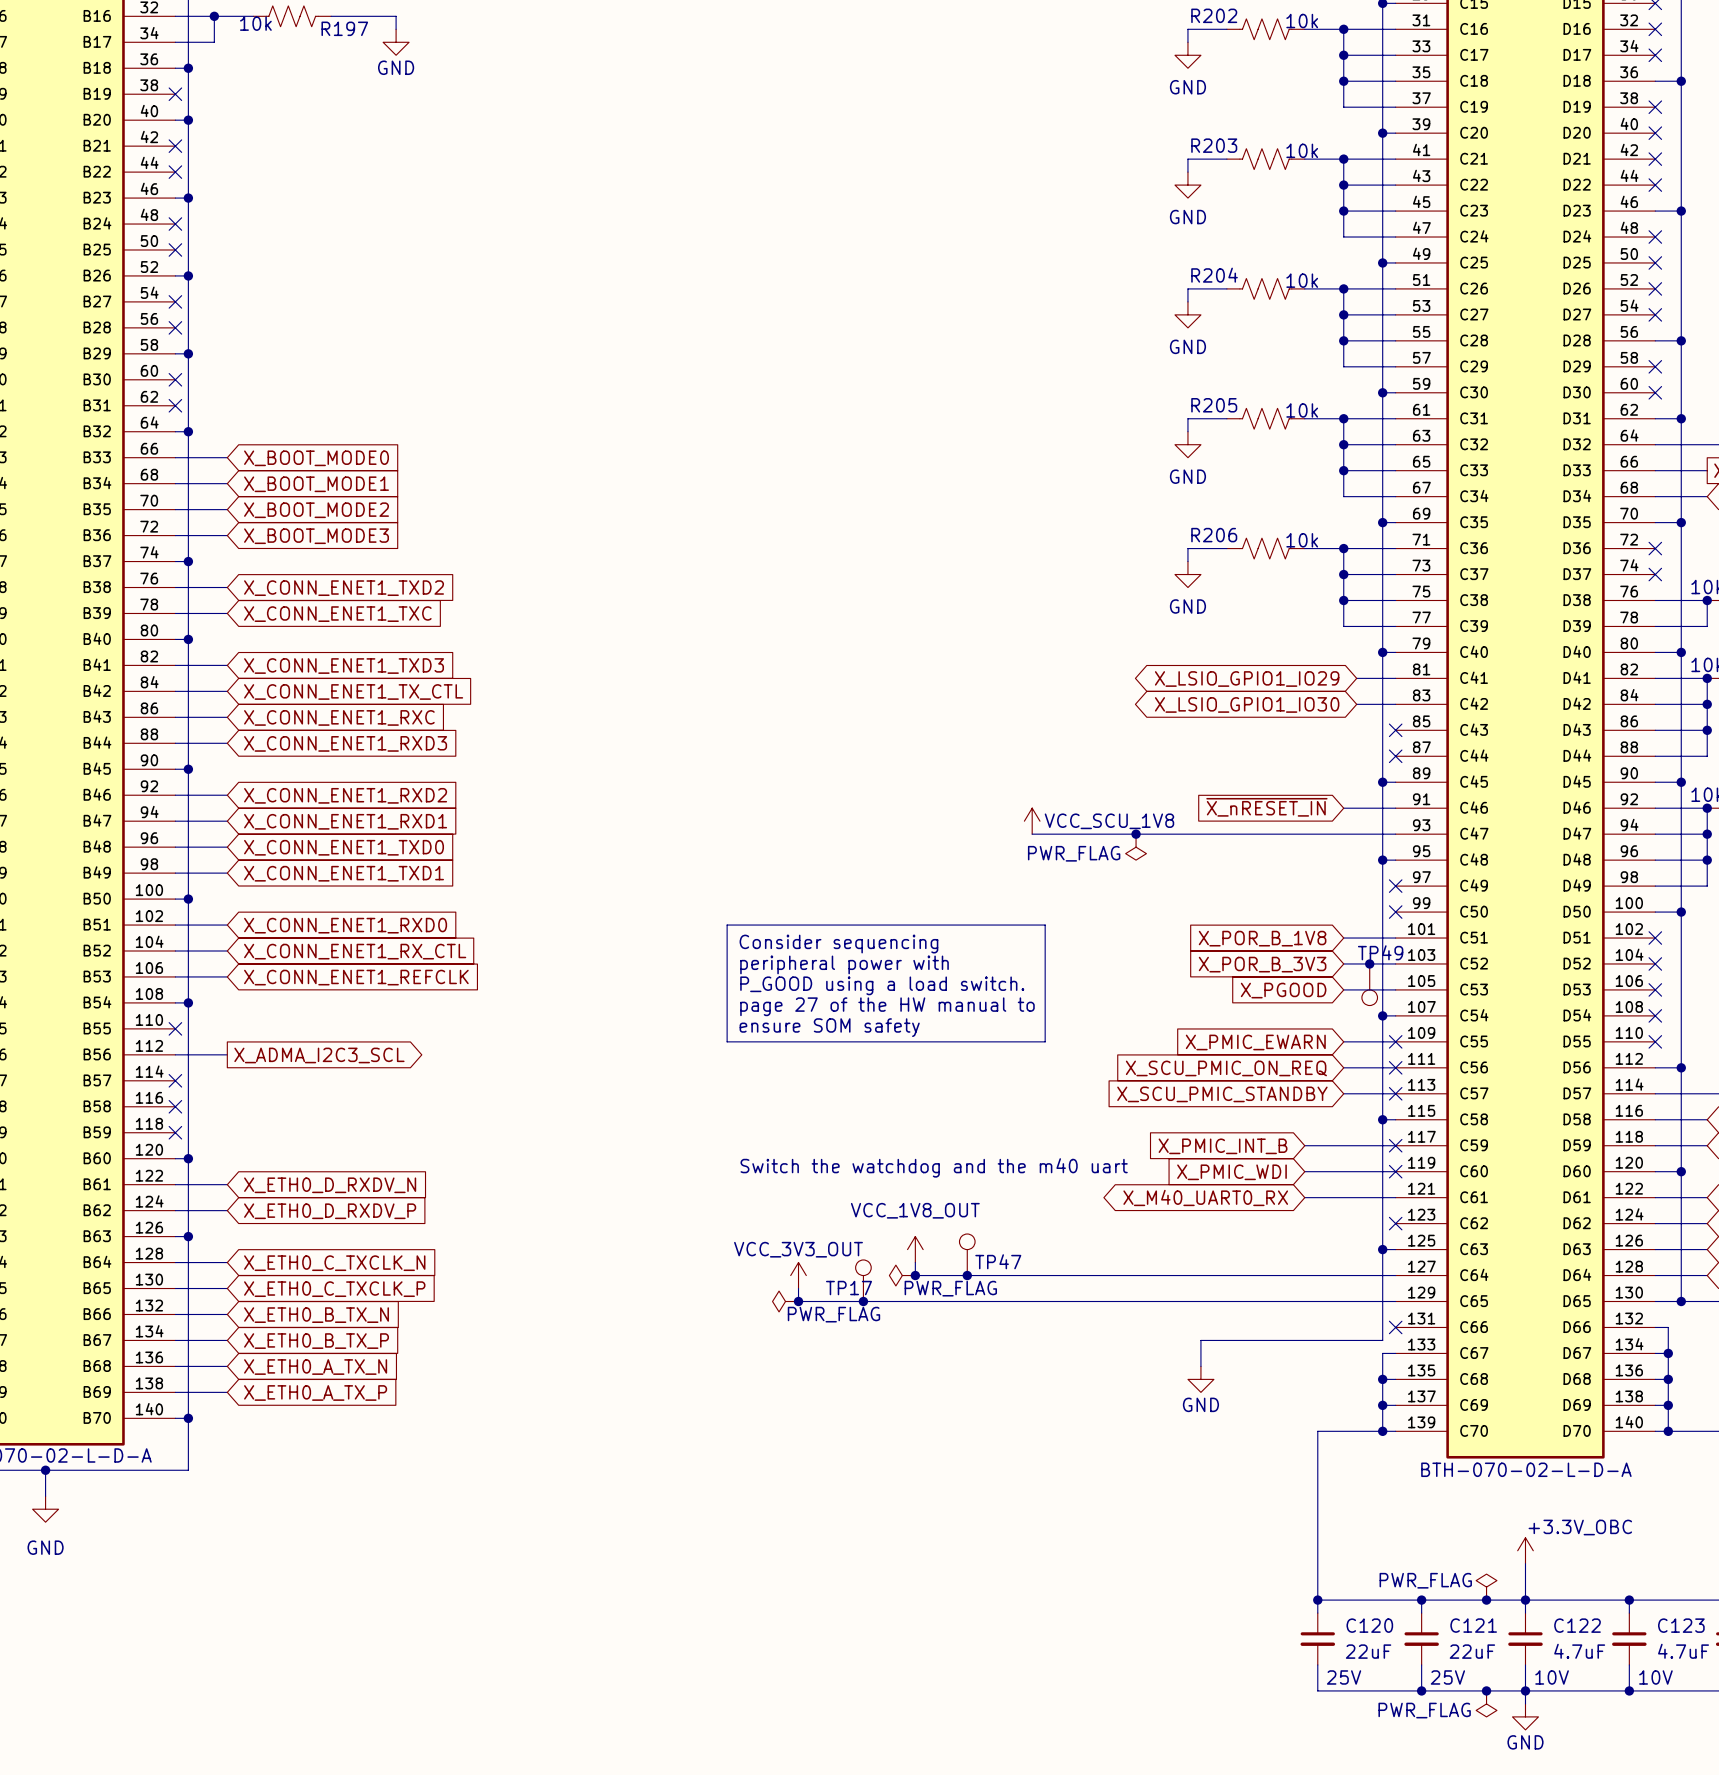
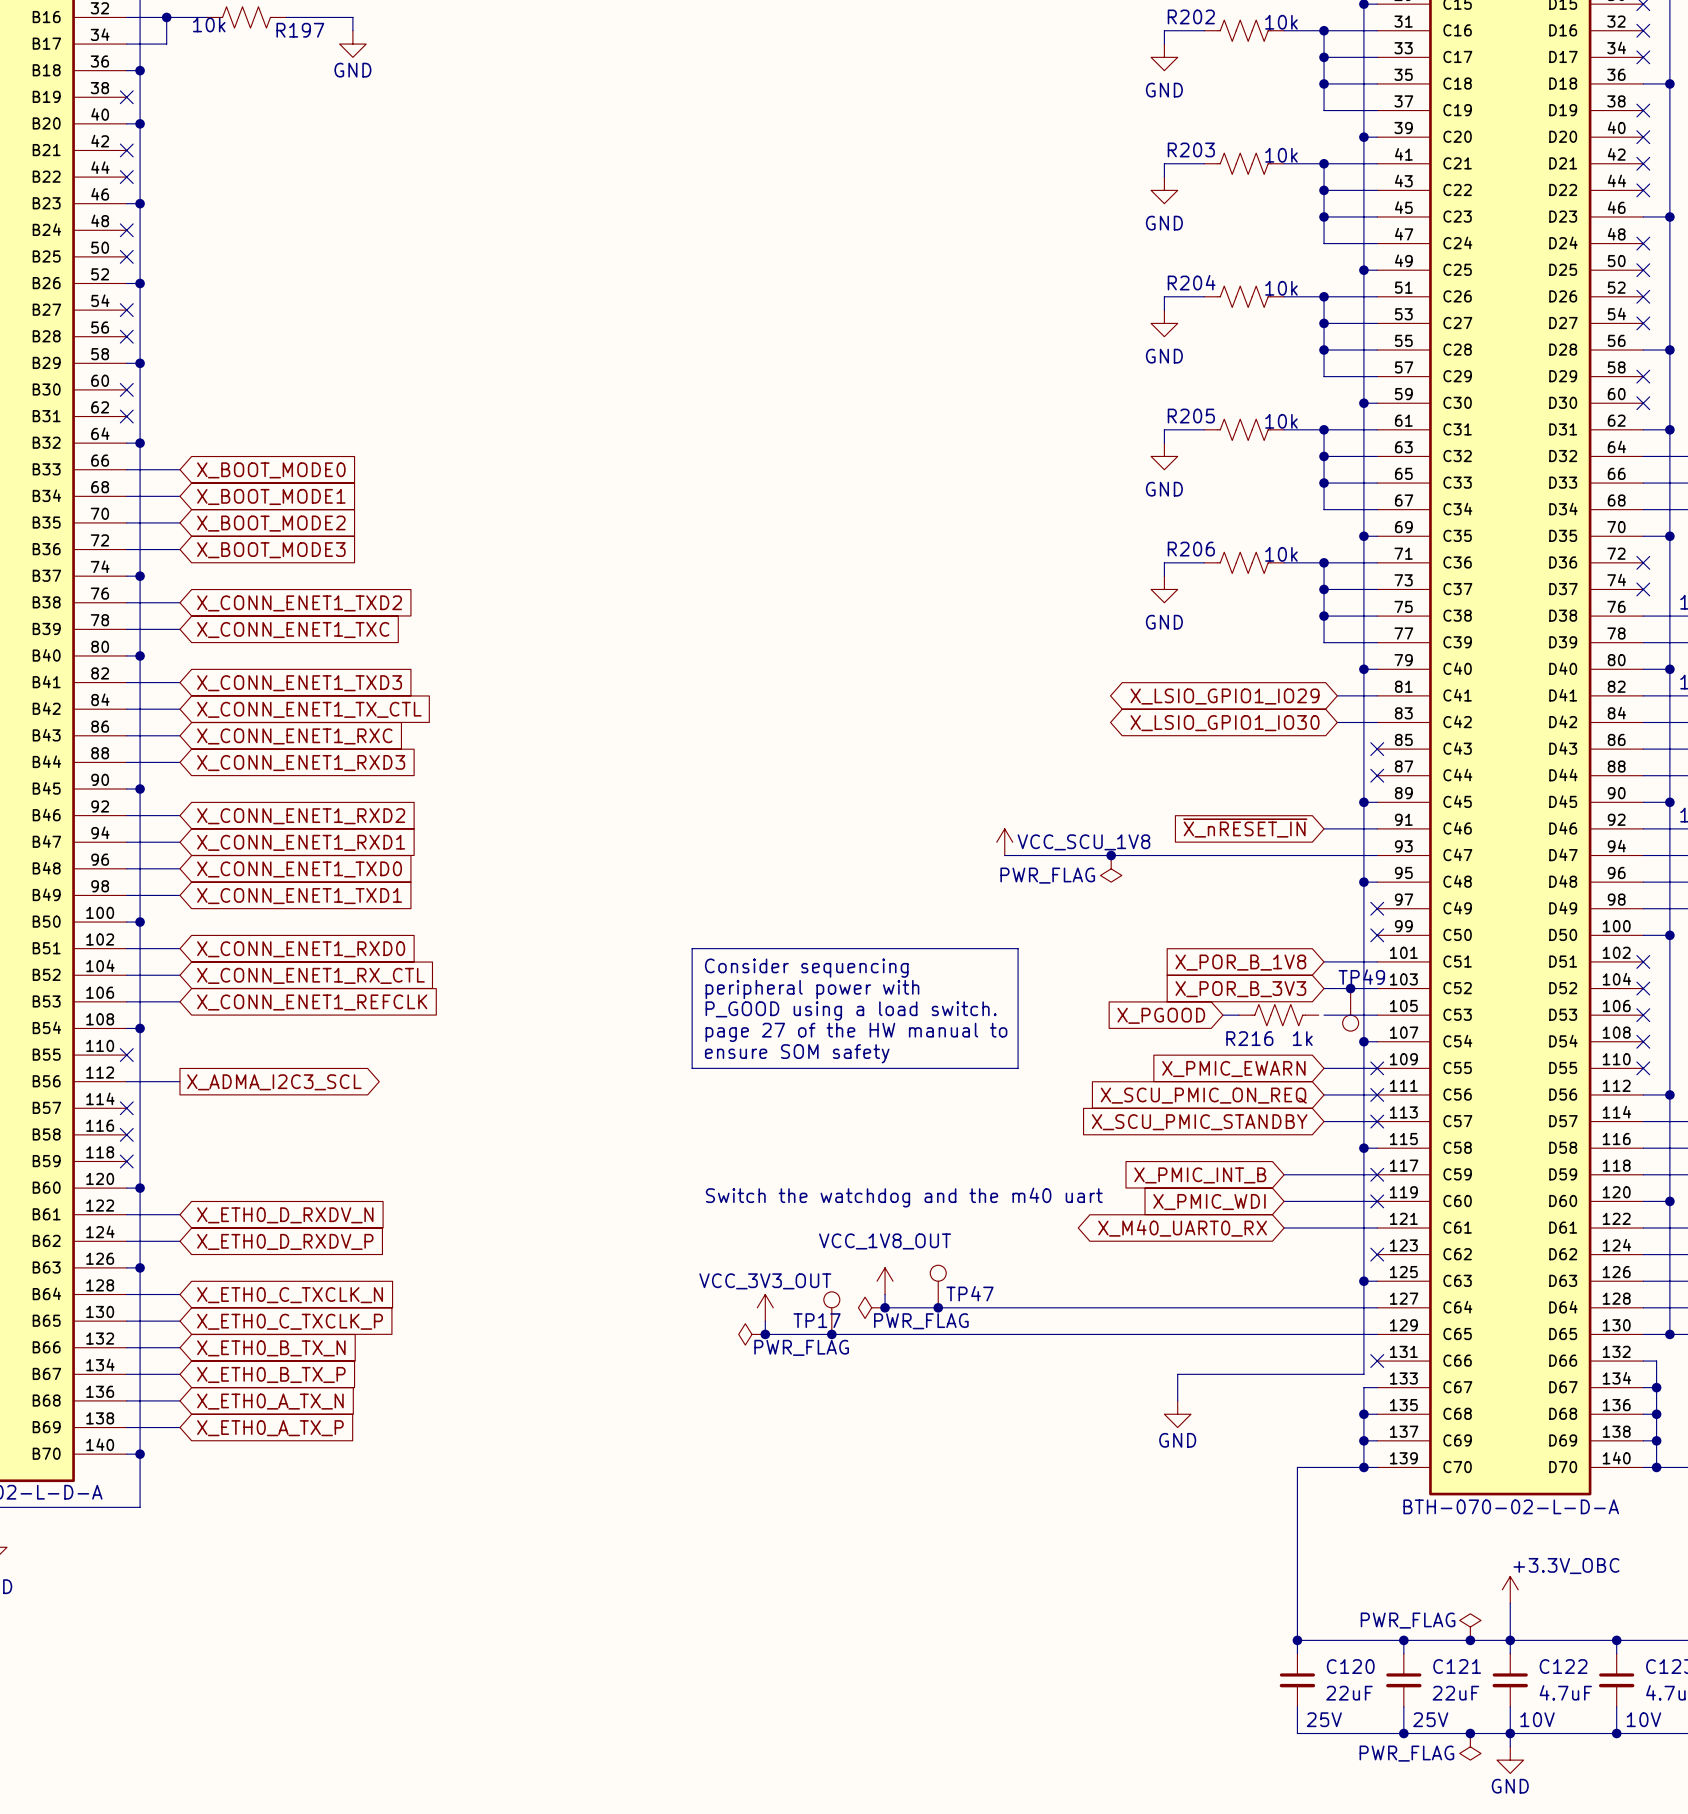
wire: none -> (1222, 1015) (1238, 1015)
R216: none -> 1k (1278, 1015)
global label position: X_PGOOD (1283, 990) -> X_PGOOD (1161, 1015)

